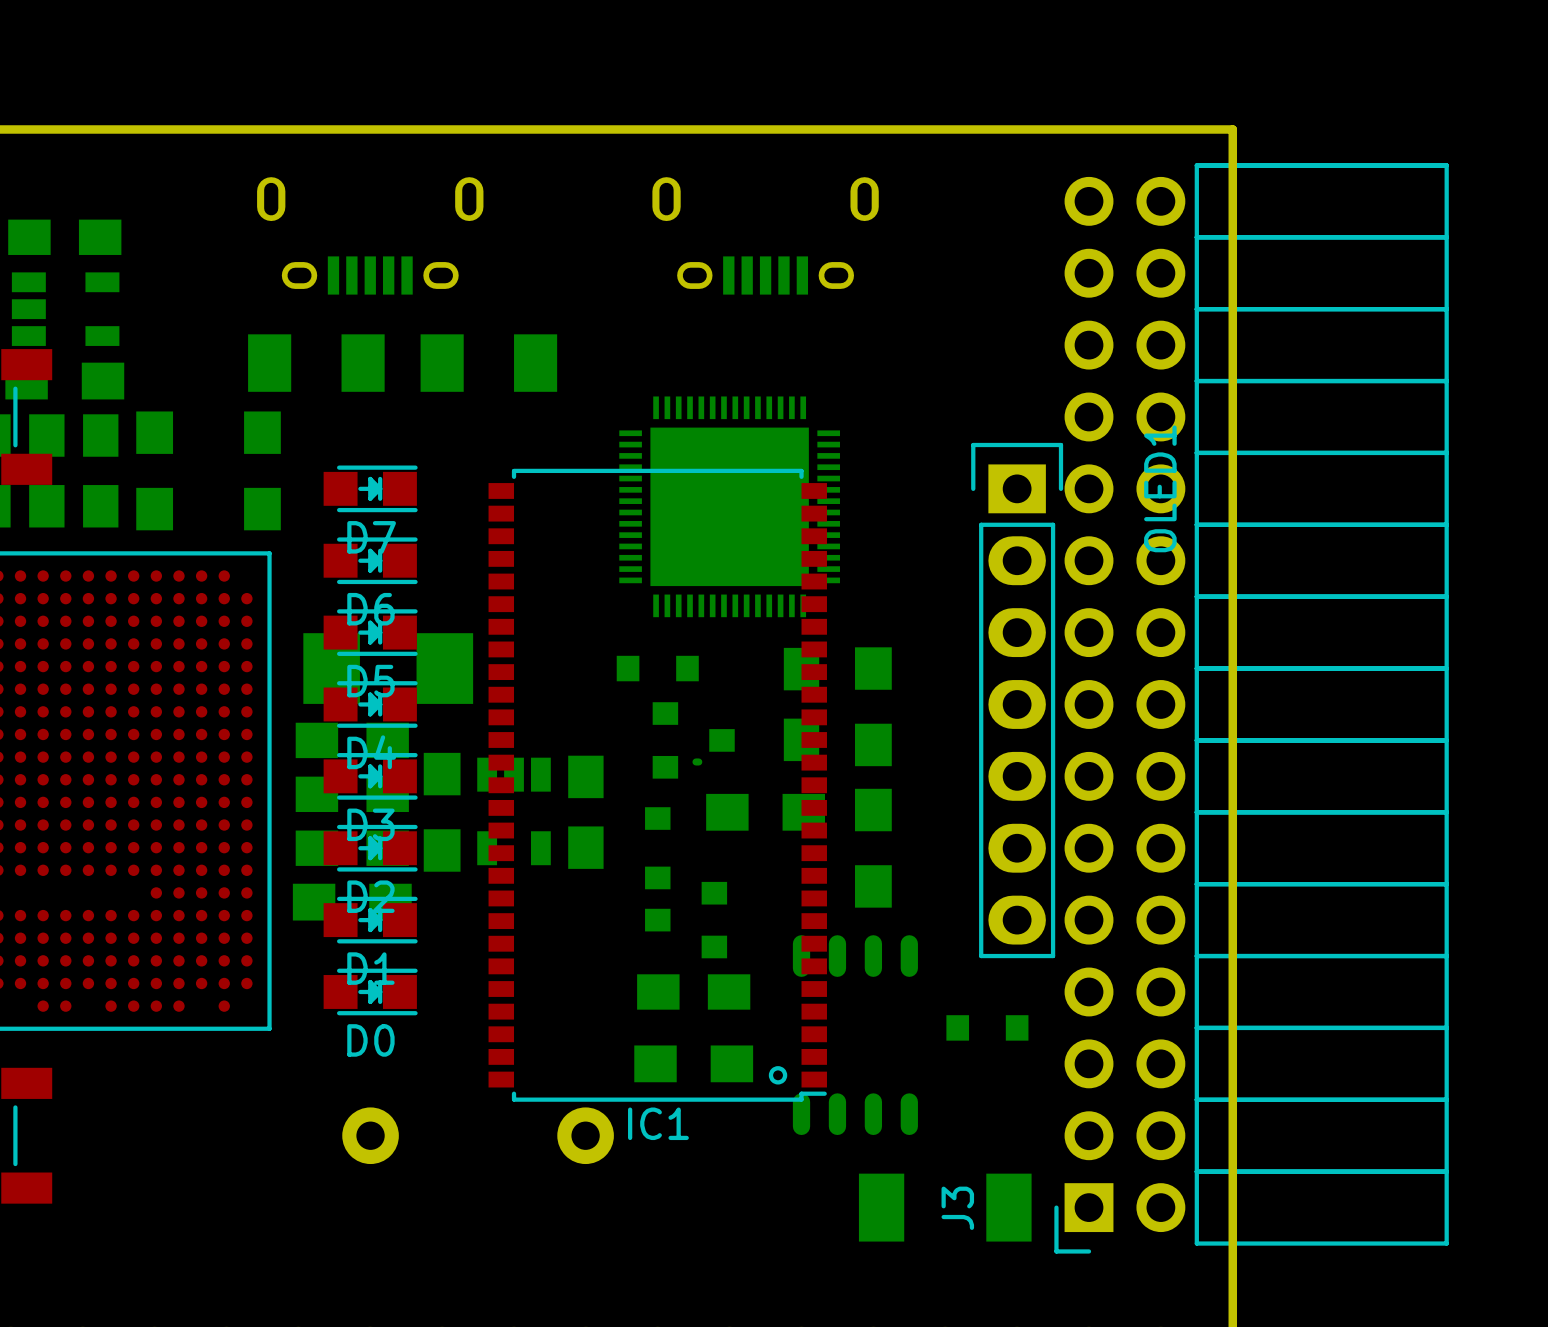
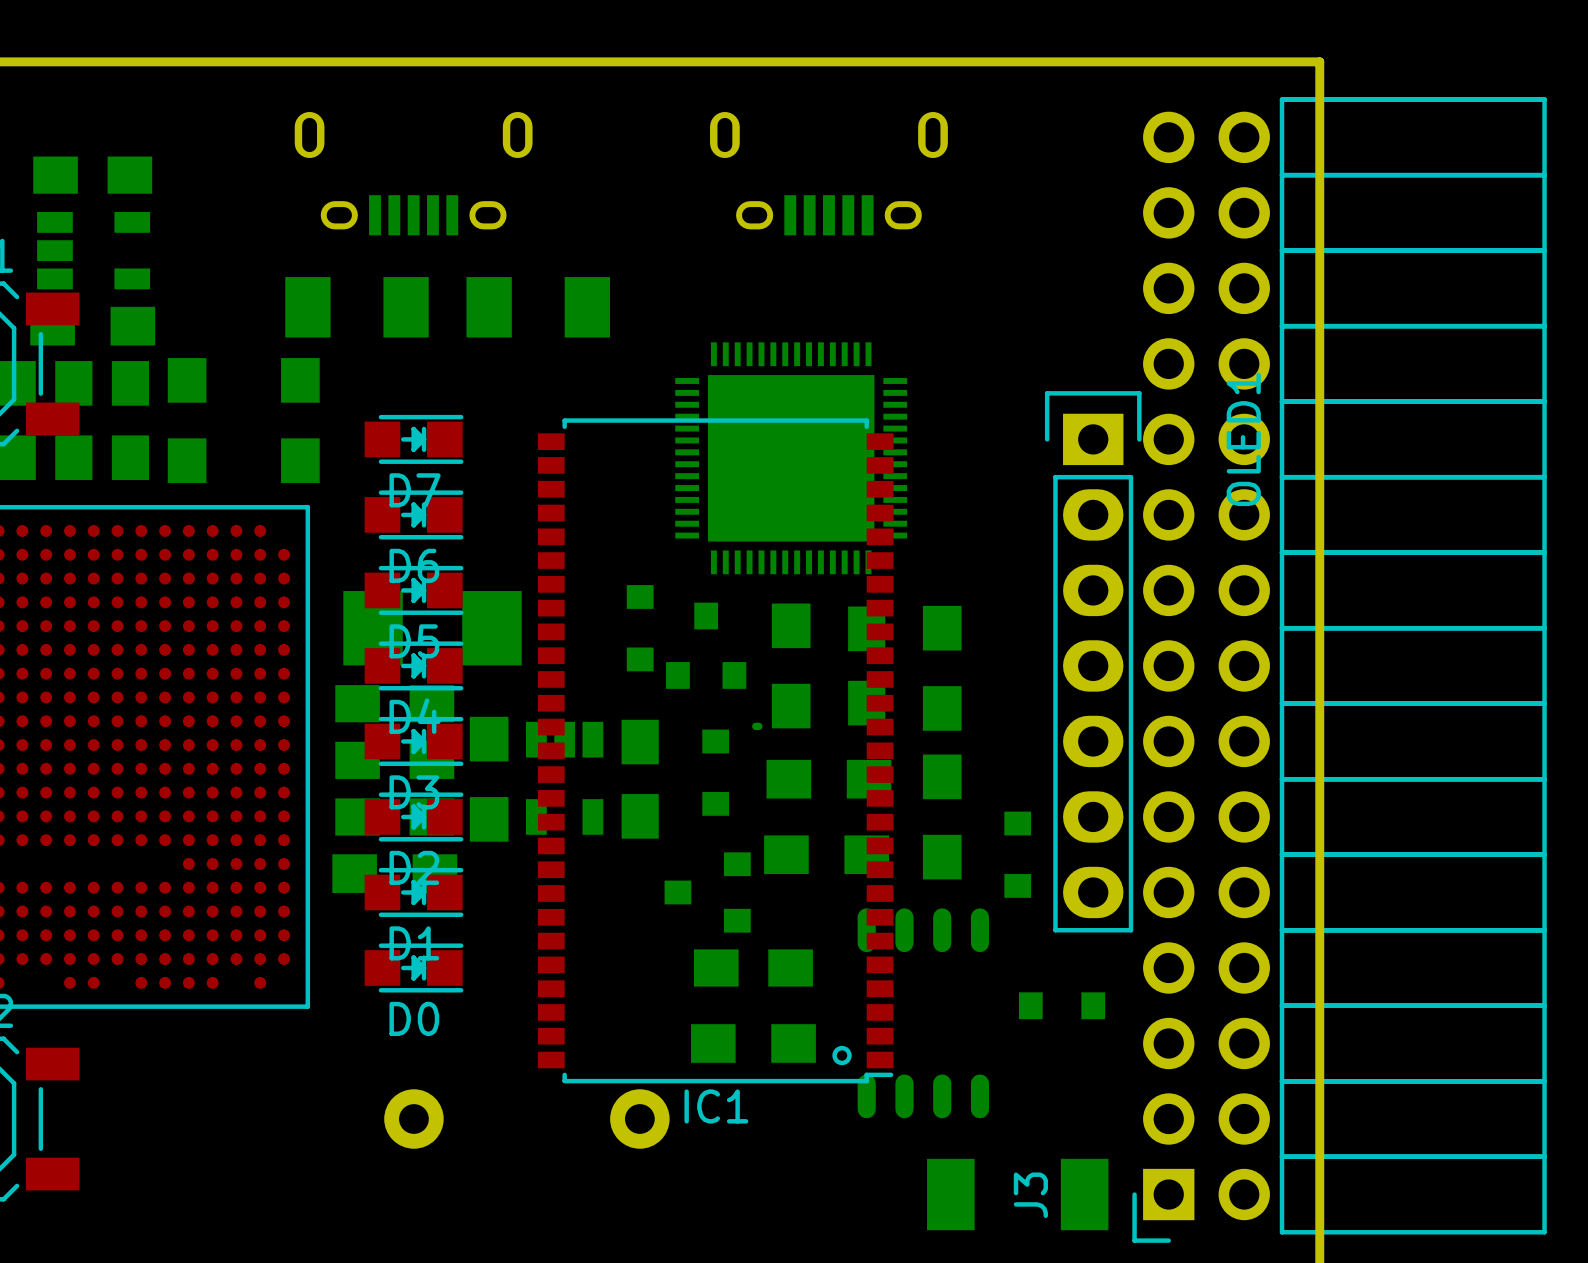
part footprint: [616, 655, 699, 682] -> [666, 602, 747, 689]
part: none -> (640, 628)
part: none -> (791, 665)
part: (693, 740) -> none
part position: (657, 848) -> (715, 772)
part: none -> (826, 854)
part: none -> (1017, 854)
part position: (686, 920) -> (707, 892)

